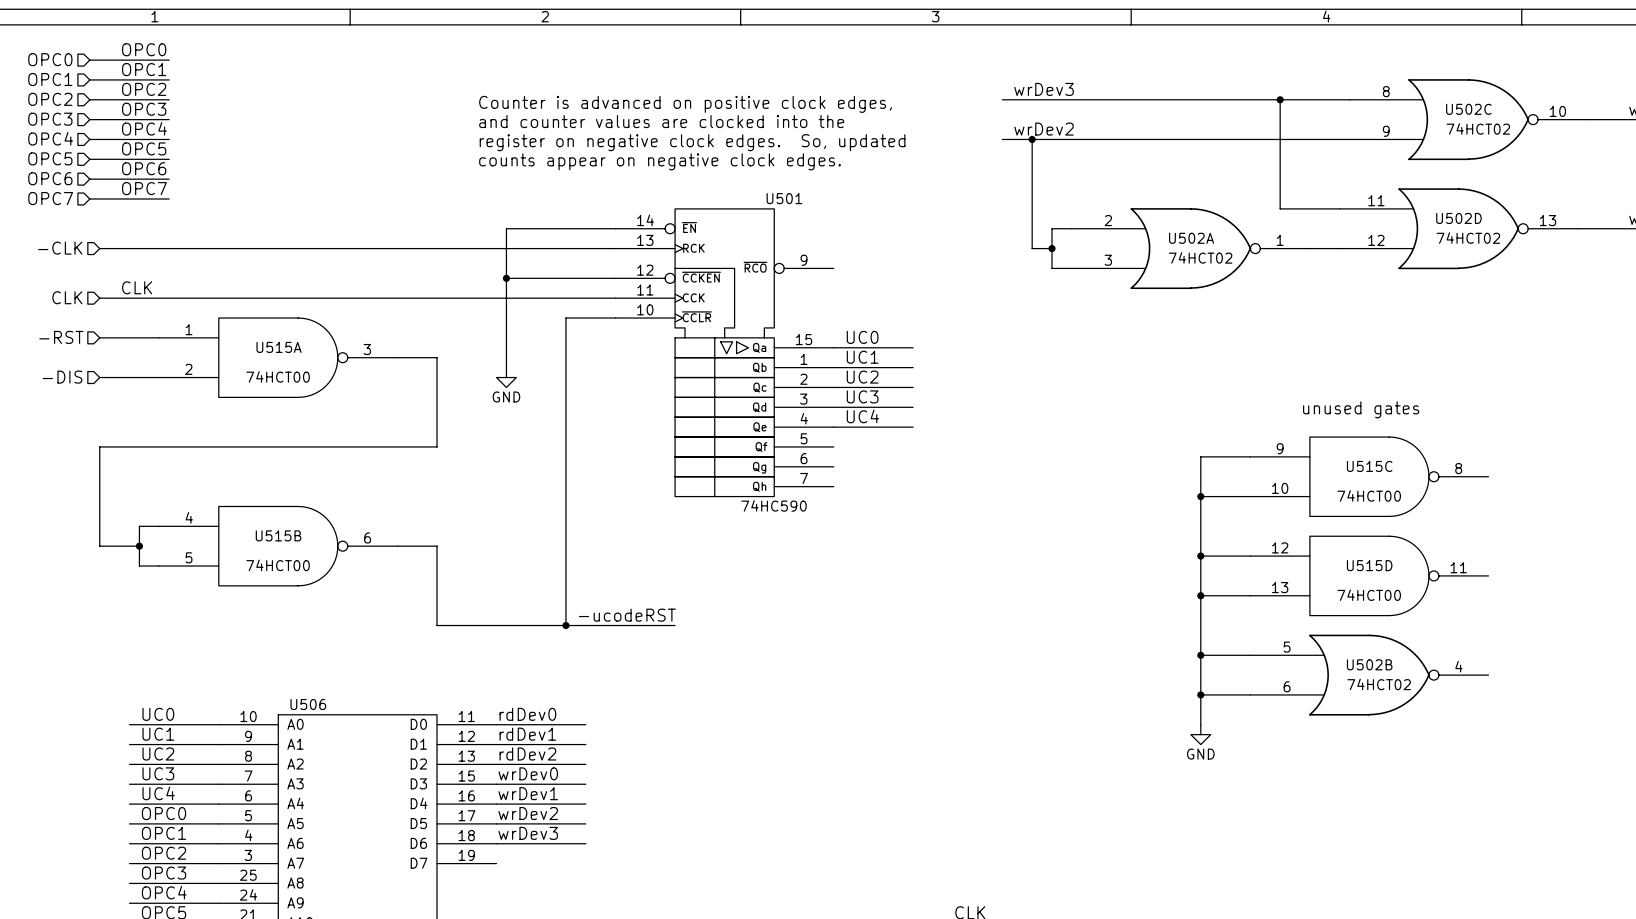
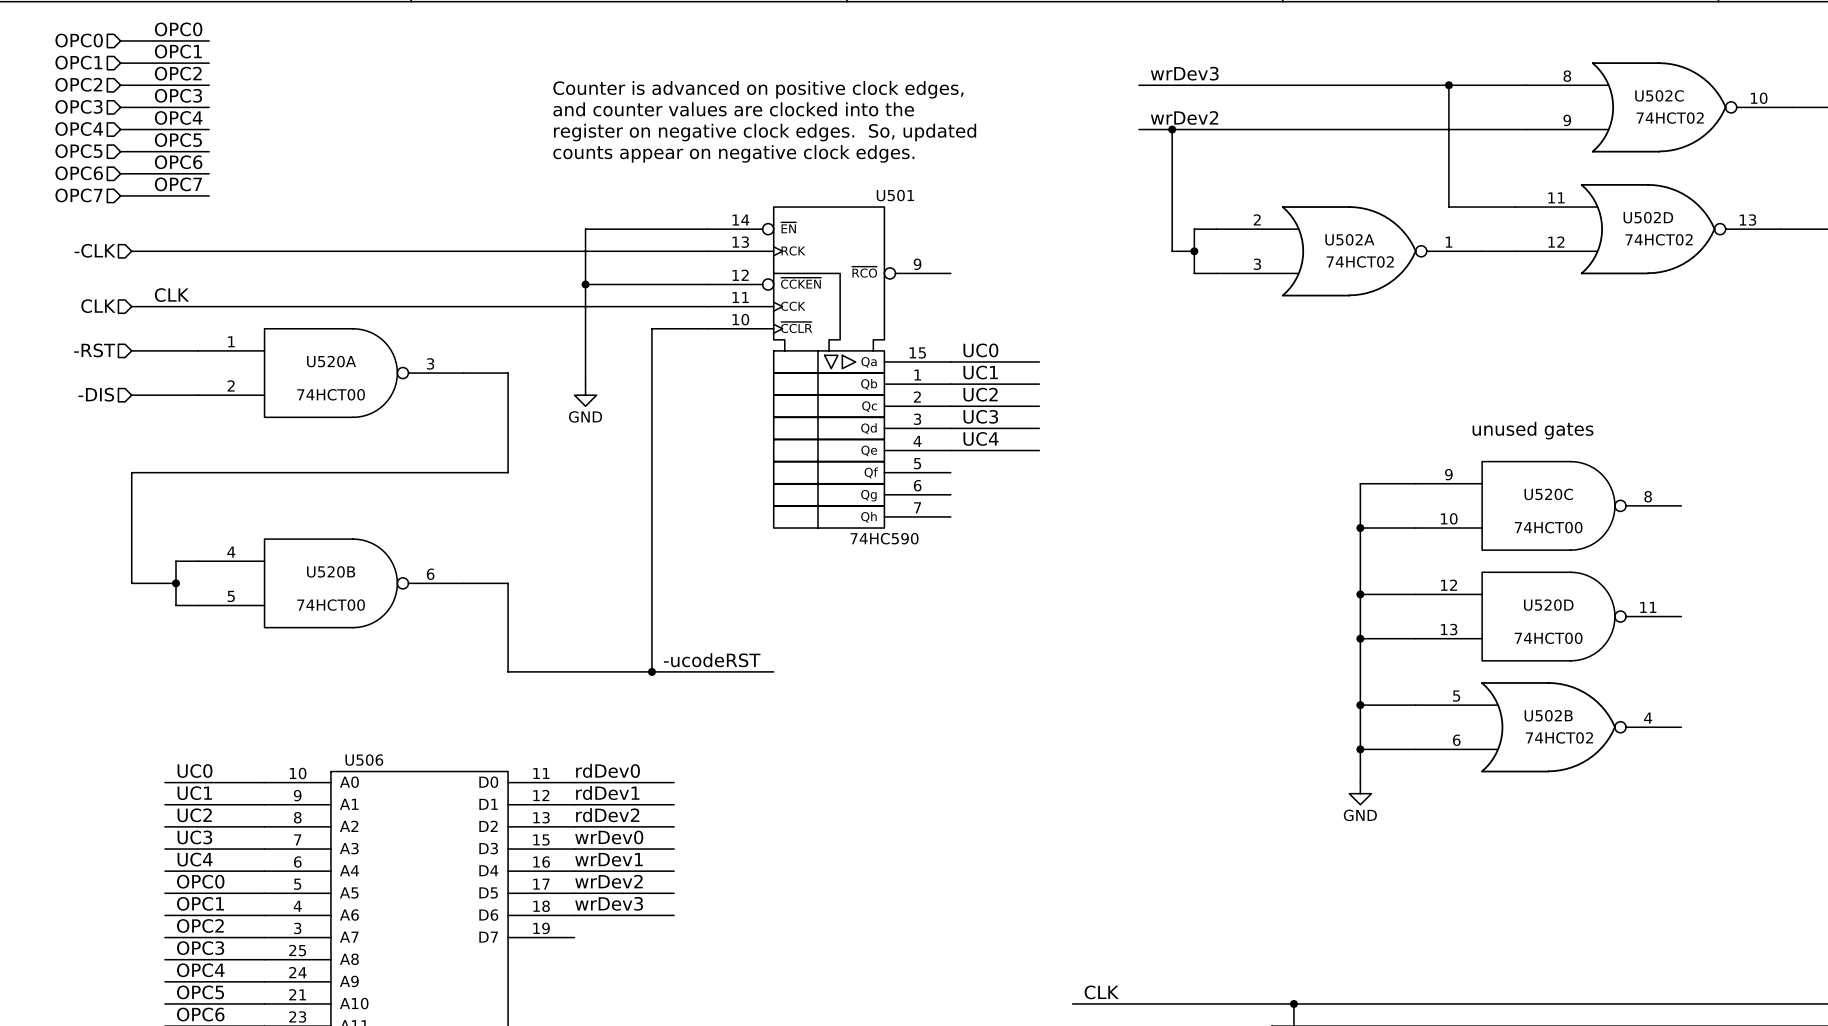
U515A name: U515A (279, 347) -> U520A (331, 361)
U515C name: U515C (1369, 466) -> U520C (1548, 494)
U515B name: U515B (278, 535) -> U520B (331, 571)
U515D name: U515D (1369, 565) -> U520D (1548, 605)

